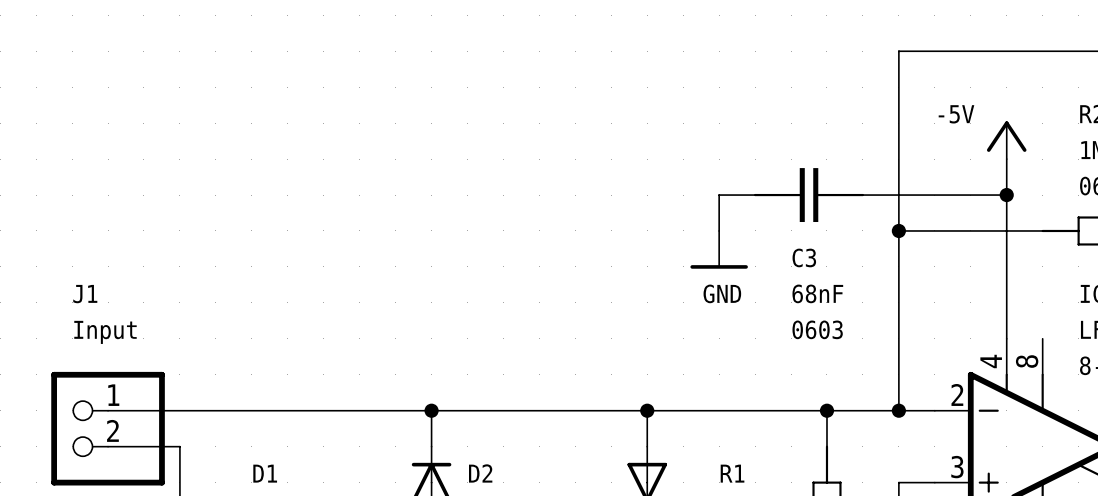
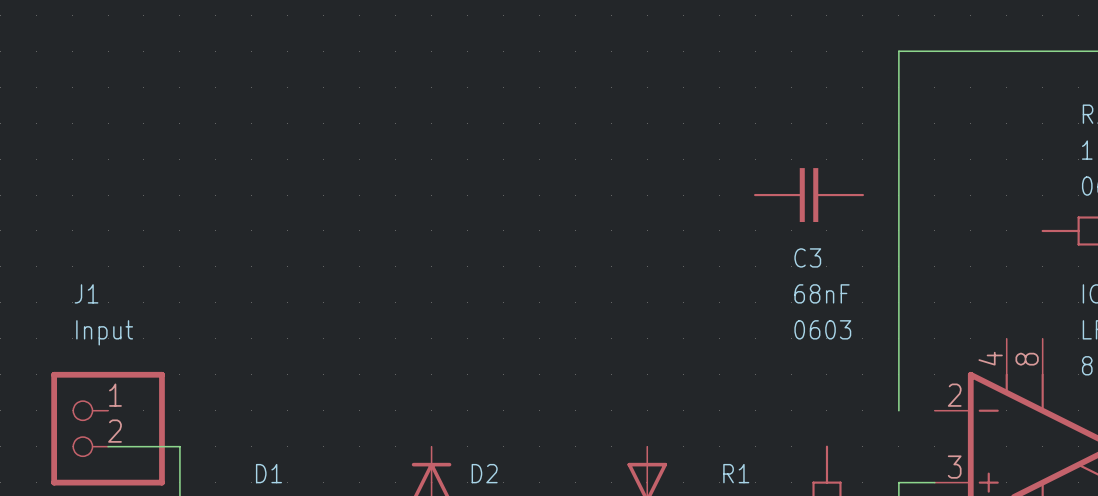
power symbol: -5V (1006, 140) -> none
wire: (1006, 159) (1006, 338) -> none
wire: (755, 195) (719, 195) (719, 230) -> none
wire: (862, 195) (1006, 195) -> none
junction: (1006, 195) -> none
wire: (898, 230) (1042, 230) -> none
junction: (898, 230) -> none
power symbol: GND (719, 249) -> none
wire: (108, 410) (934, 410) -> none
wire: (431, 410) (431, 446) -> none
junction: (431, 410) -> none
wire: (647, 410) (647, 446) -> none
junction: (647, 410) -> none
wire: (826, 410) (826, 446) -> none
junction: (826, 410) -> none
junction: (898, 410) -> none

